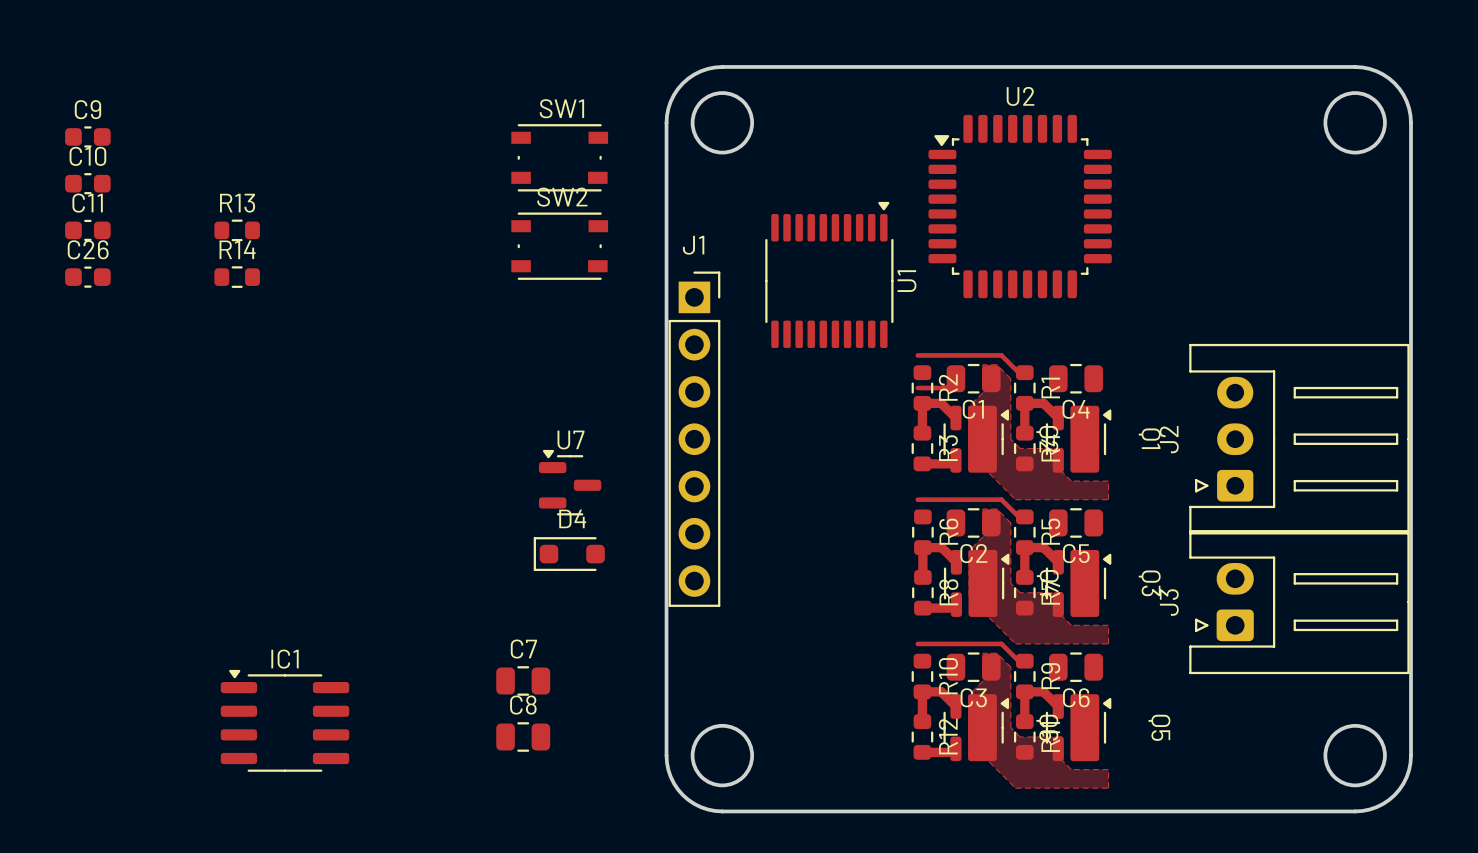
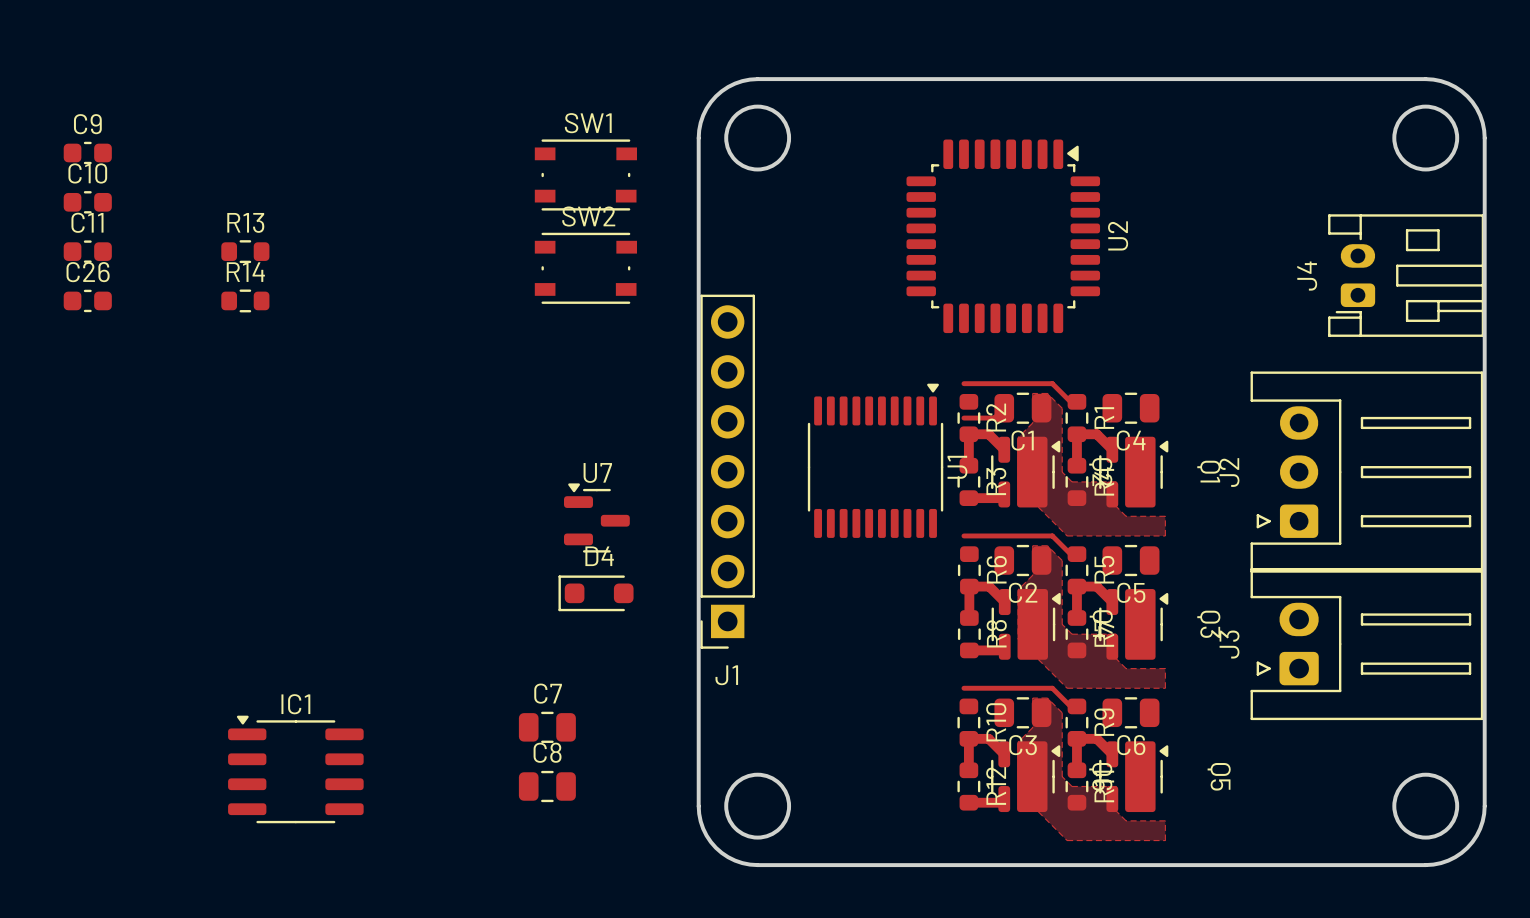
U2 rotation: 0° (1020, 206) -> 90° clockwise (1003, 236)
J4: none -> (1406, 275)
U1 position: (829, 274) -> (875, 460)
J1 rotation: 0° (694, 439) -> 180° (727, 471)

